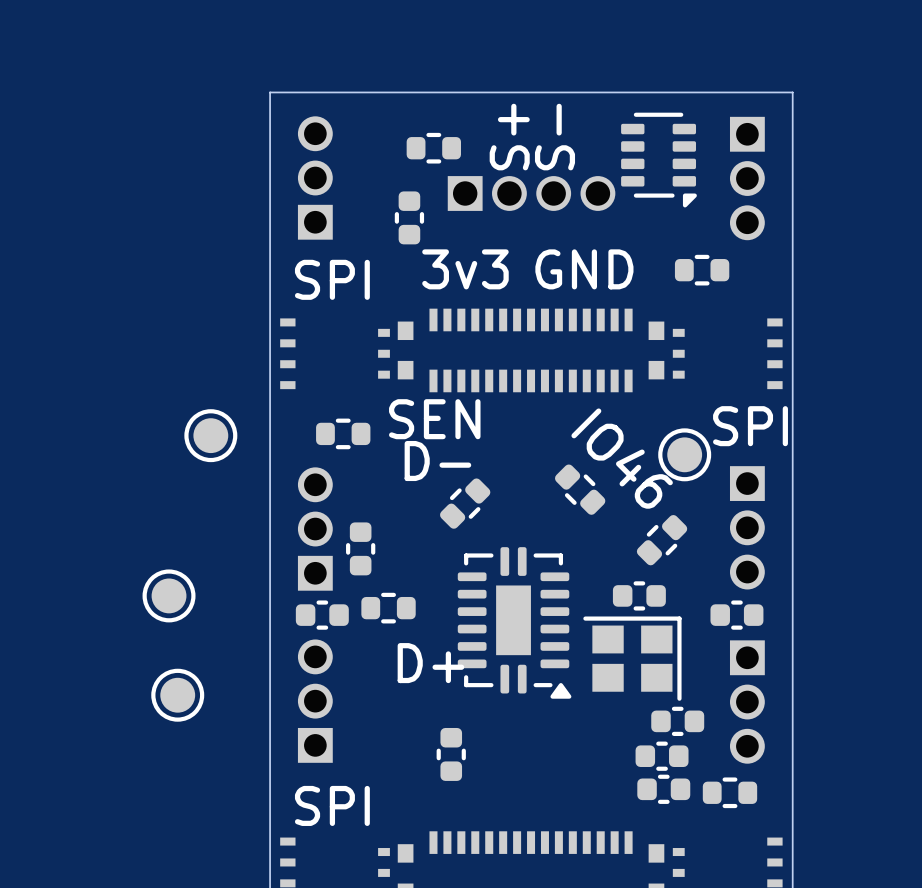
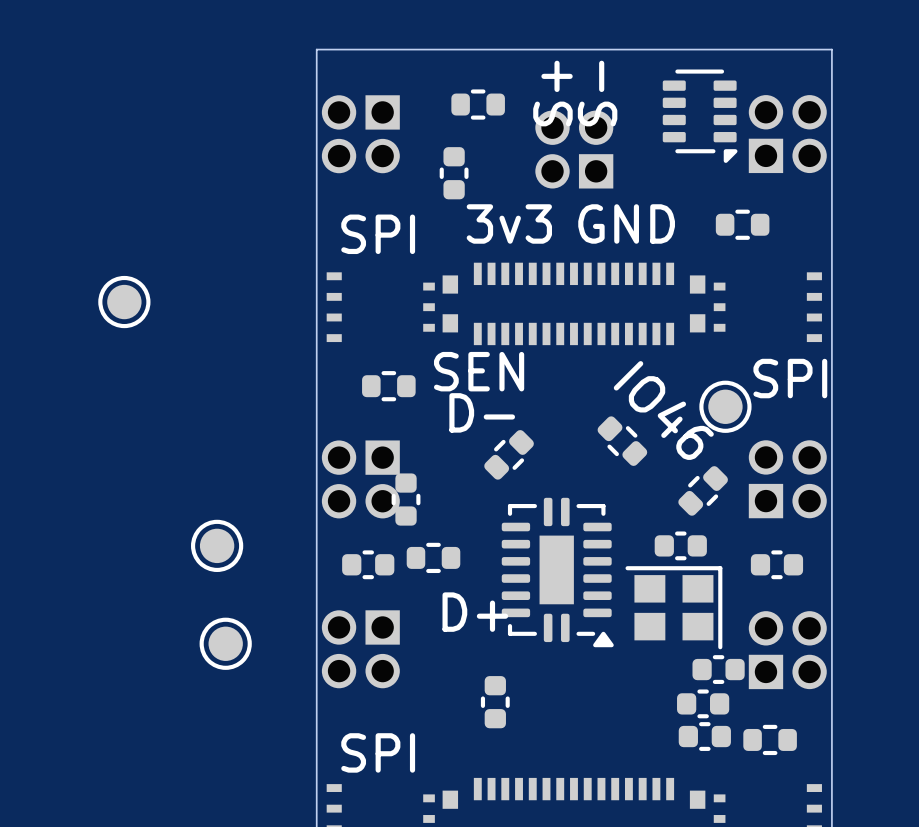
part footprint: [297, 116, 333, 240] -> [321, 95, 400, 174]
part footprint: [729, 116, 765, 241] -> [748, 95, 827, 174]
part footprint: [447, 176, 616, 211] -> [535, 110, 614, 189]
part position: (210, 435) -> (124, 302)
part footprint: [729, 466, 765, 590] -> [748, 440, 827, 519]
part footprint: [297, 467, 333, 591] -> [321, 440, 400, 519]
part footprint: [297, 639, 333, 763] -> [321, 610, 400, 689]
part footprint: [729, 640, 765, 764] -> [748, 611, 827, 690]

